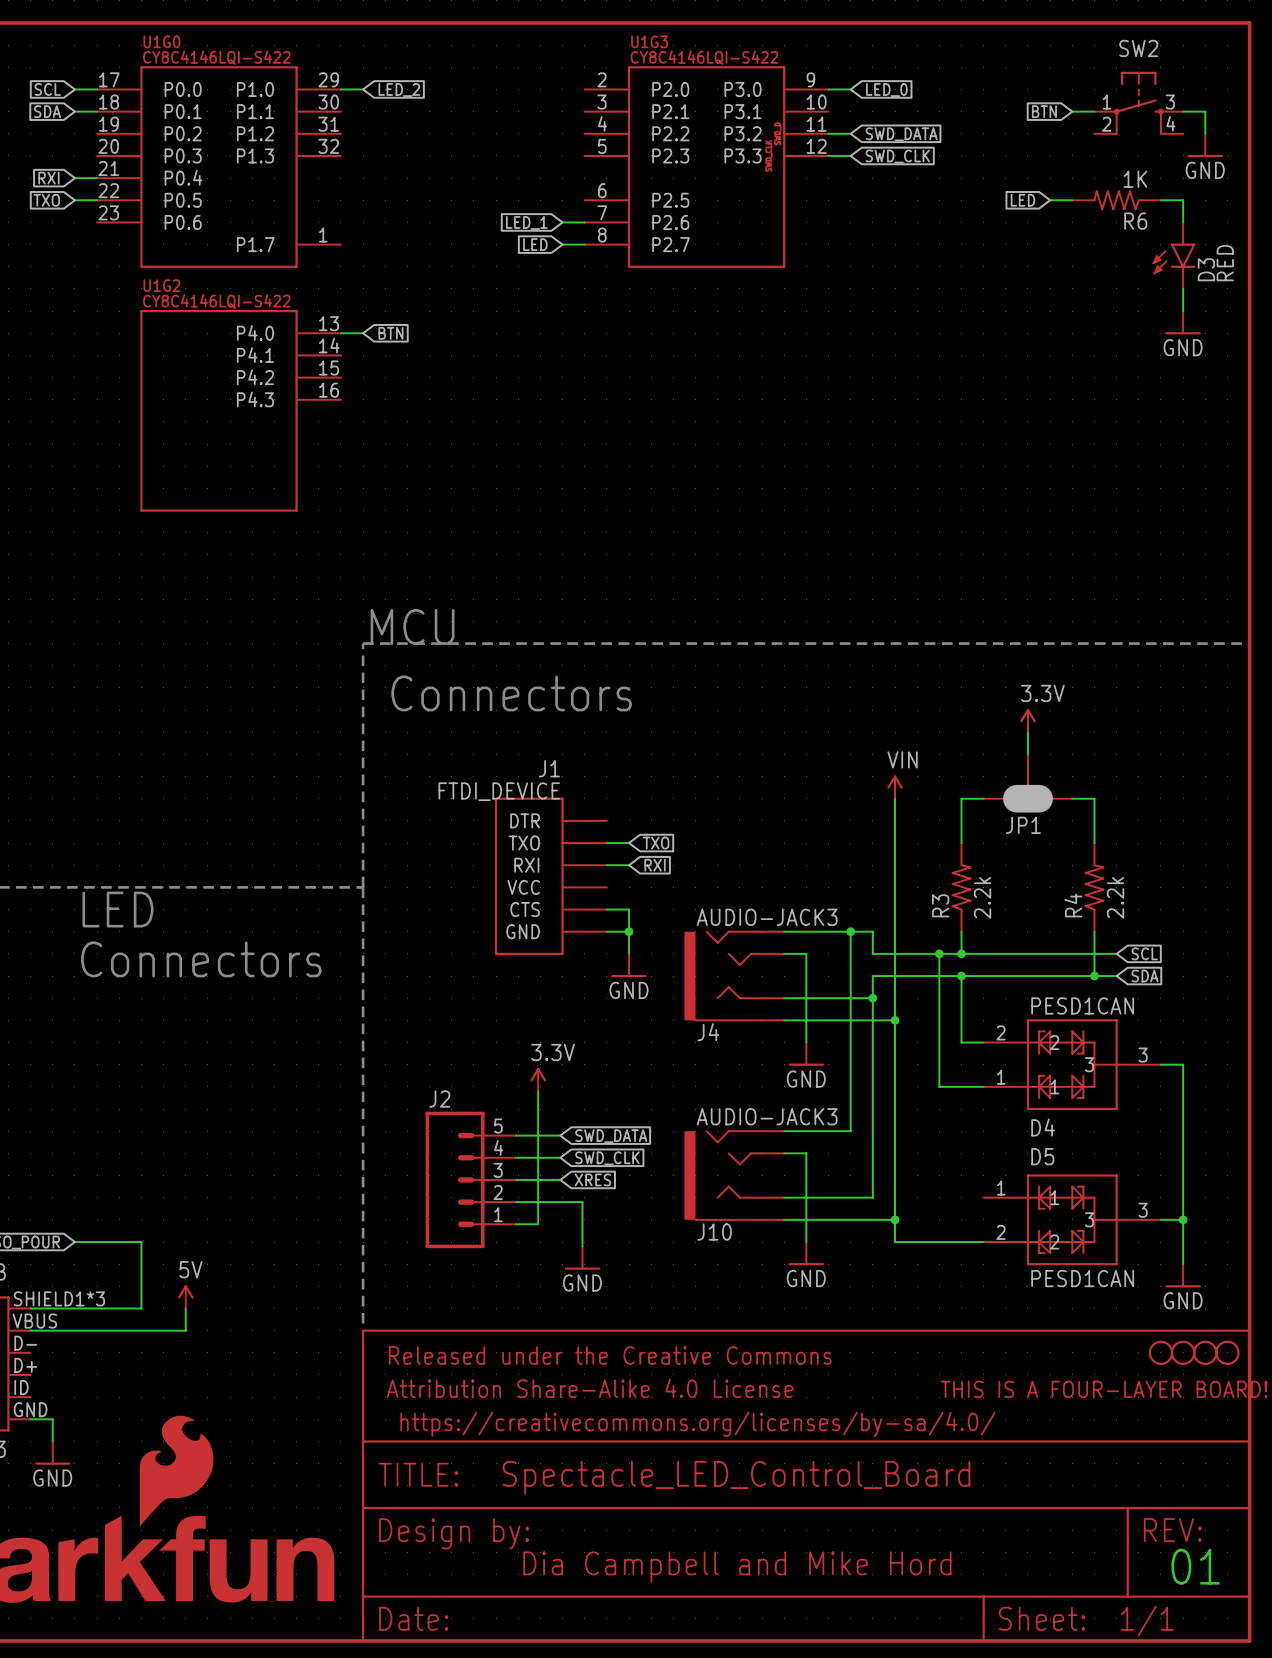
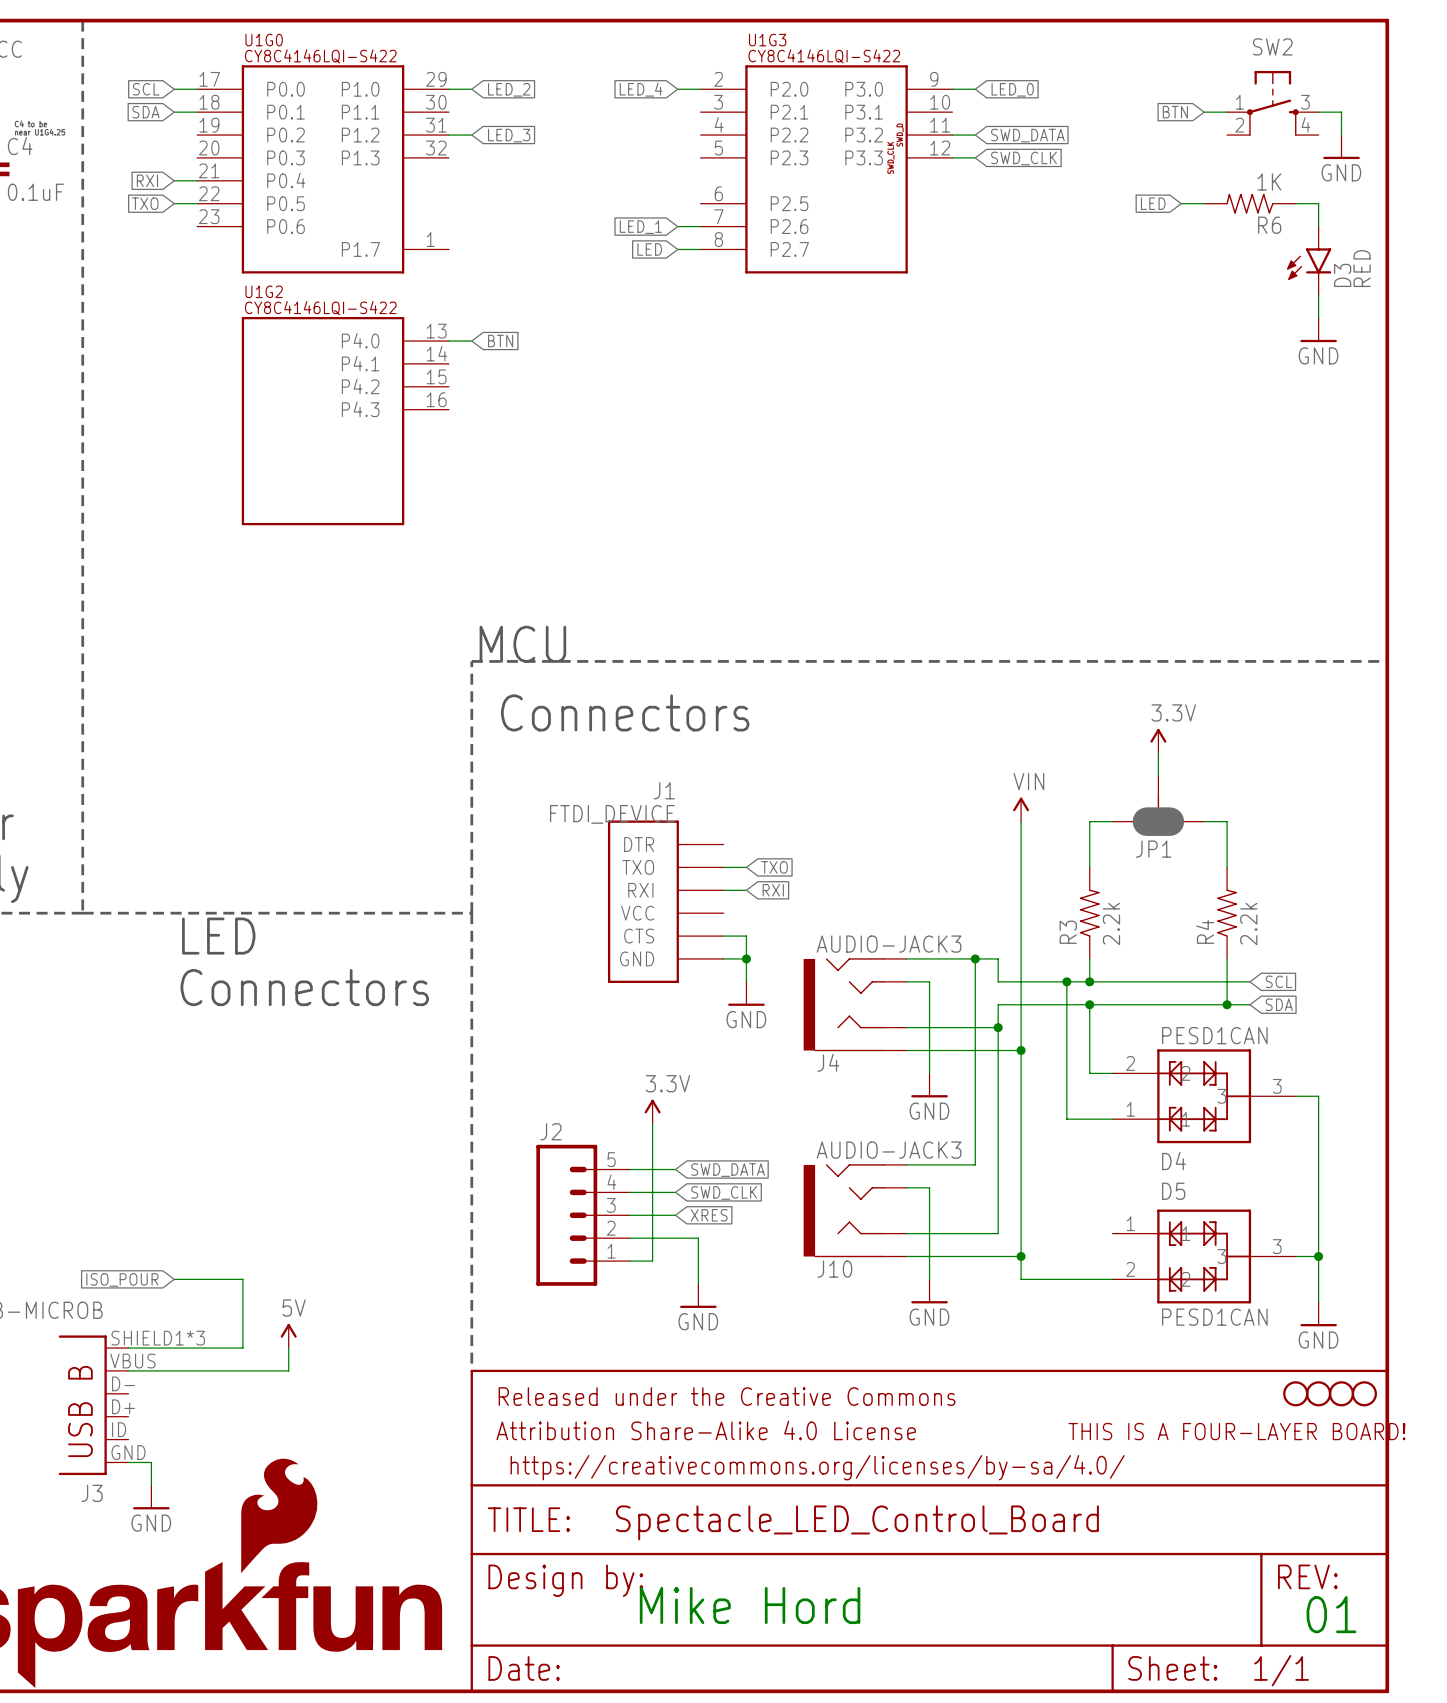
global label: none -> LED_4 (641, 89)
wire: none -> (677, 89) (700, 89)
wire: none -> (448, 135) (471, 135)
global label: none -> LED_3 (509, 135)
text: Dia Campbell and Mike Hord (737, 1567) -> Mike Hord (750, 1605)

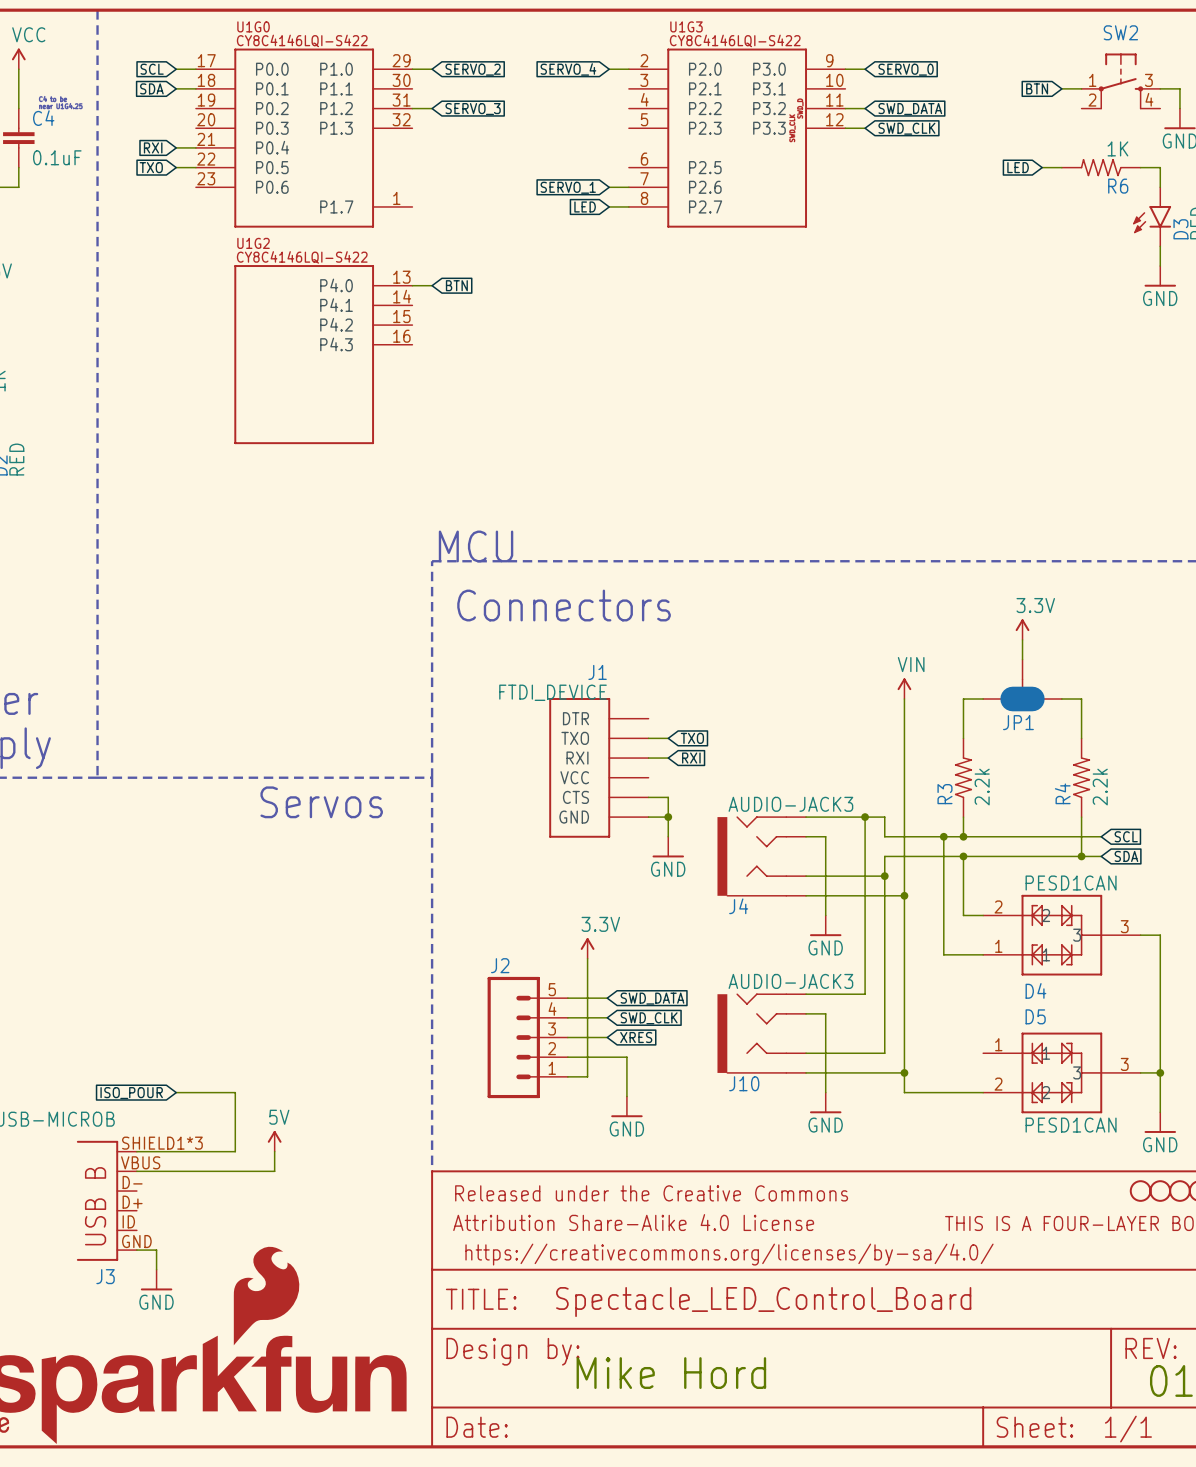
global label: LED_2 (509, 89) -> SERVO_2 (473, 69)
global label: LED_4 (641, 89) -> SERVO_4 (568, 69)
global label: LED_0 (1012, 89) -> SERVO_0 (906, 69)
global label: LED_3 (509, 135) -> SERVO_3 (473, 109)
global label: LED_1 (640, 227) -> SERVO_1 (568, 187)
text: LED (218, 936) -> none
text: none -> Servos (321, 802)
text: Connectors (304, 987) -> none

